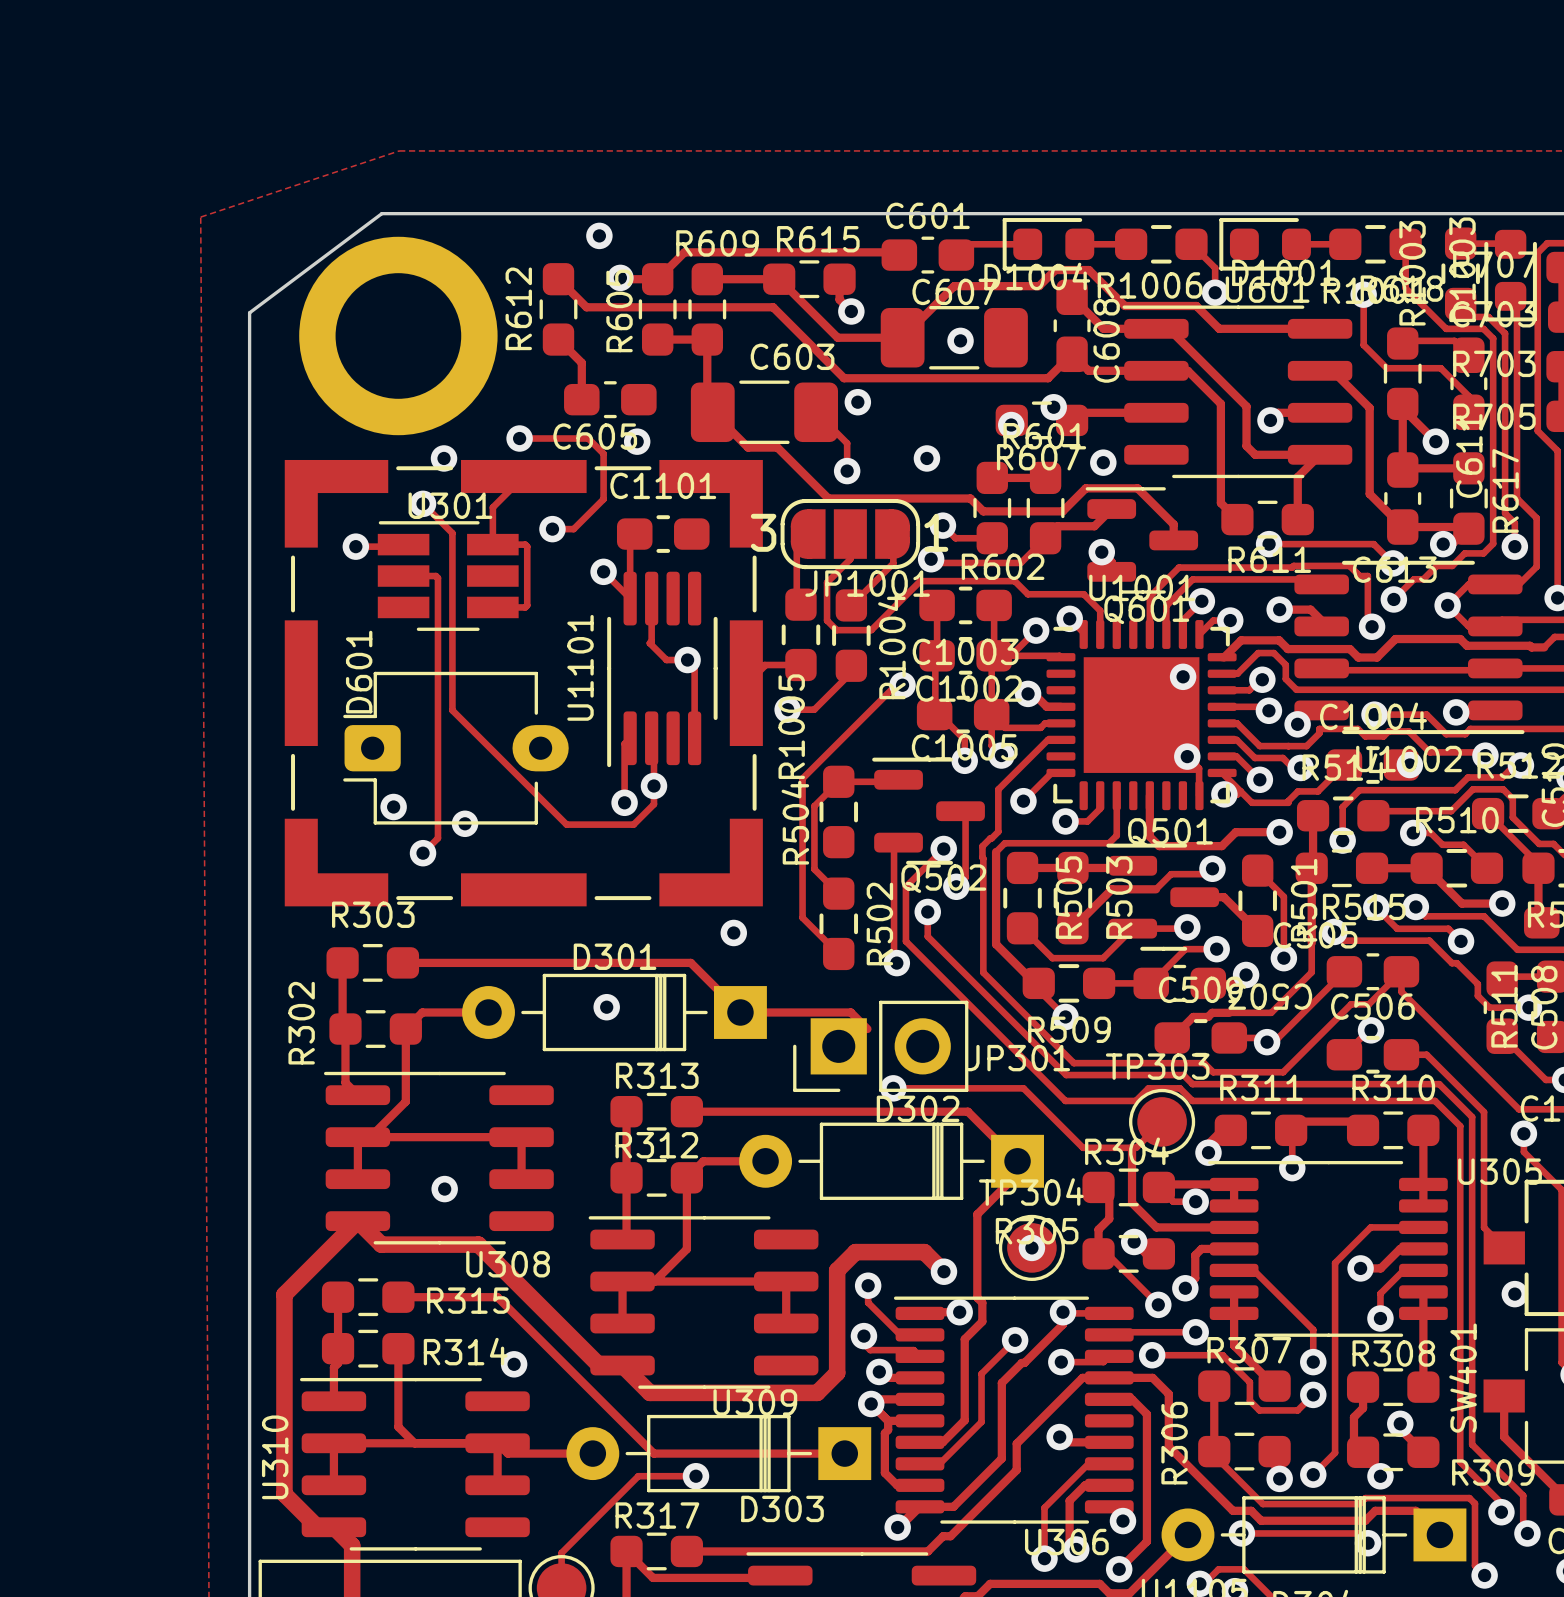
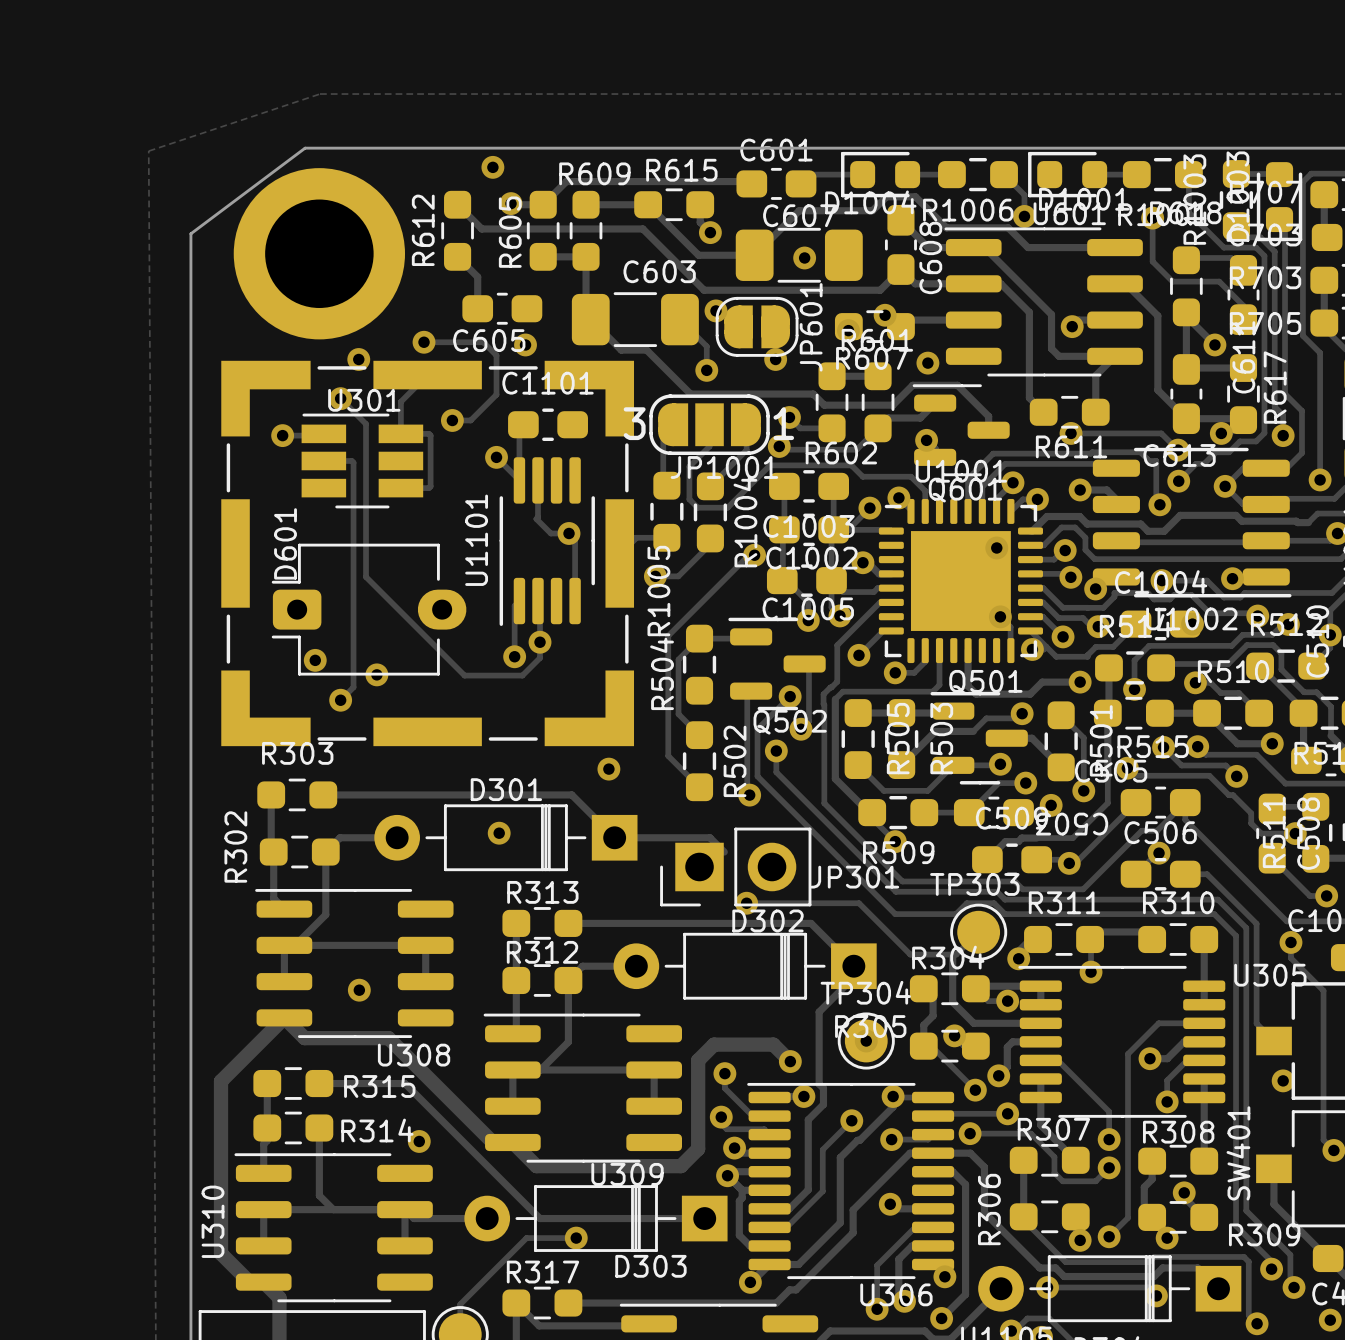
JP601: none -> (757, 326)

